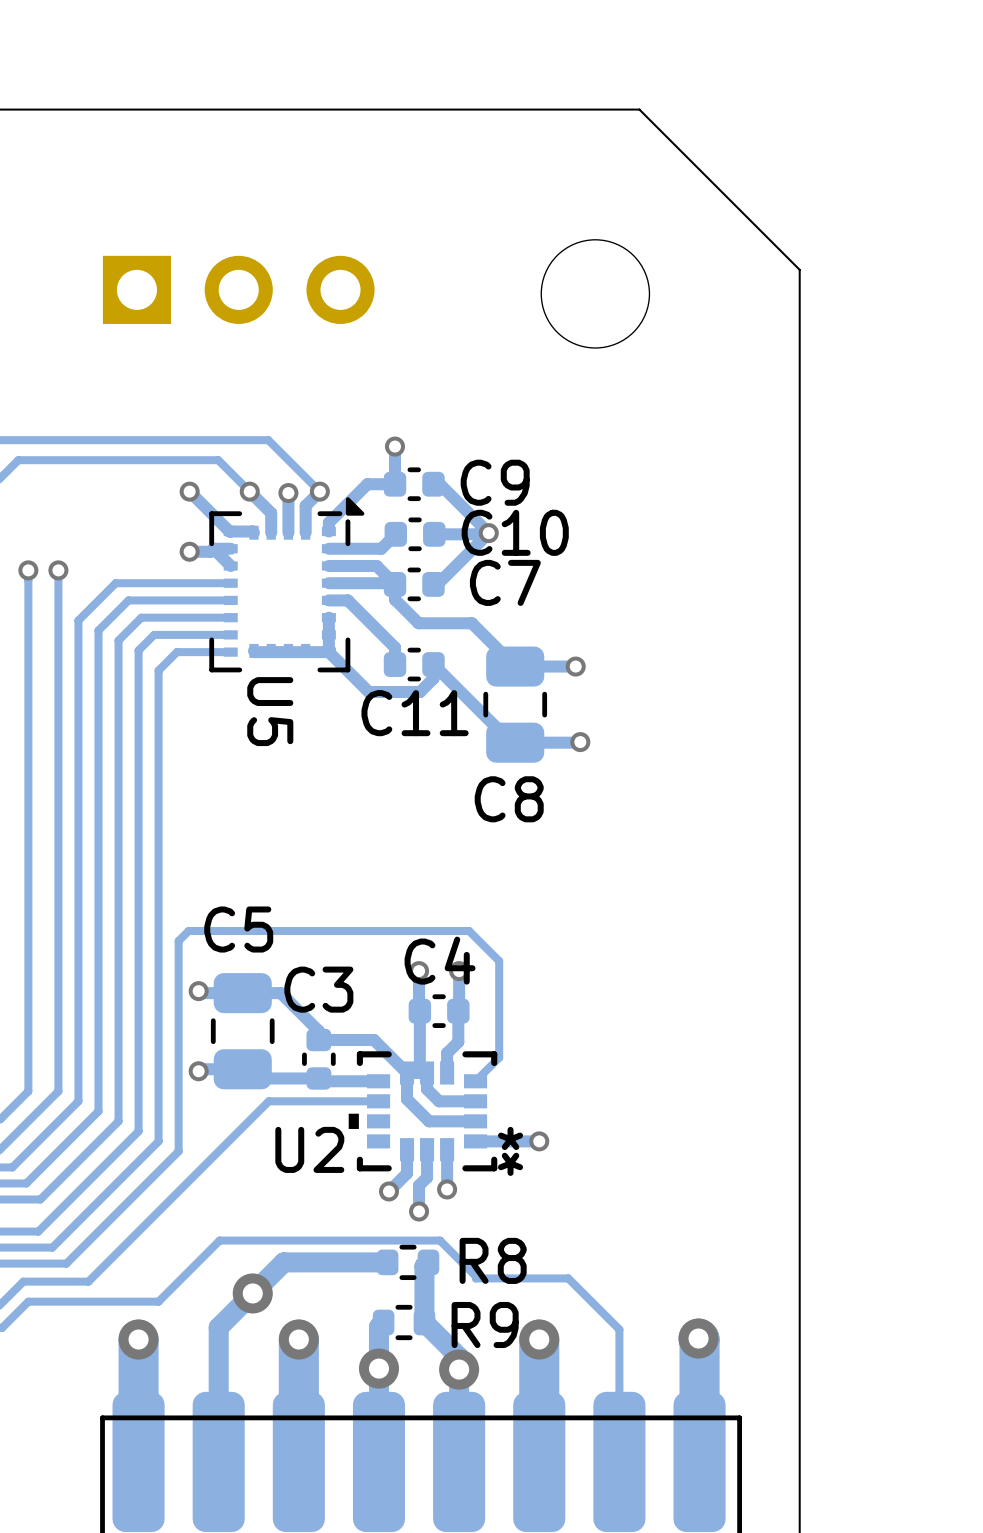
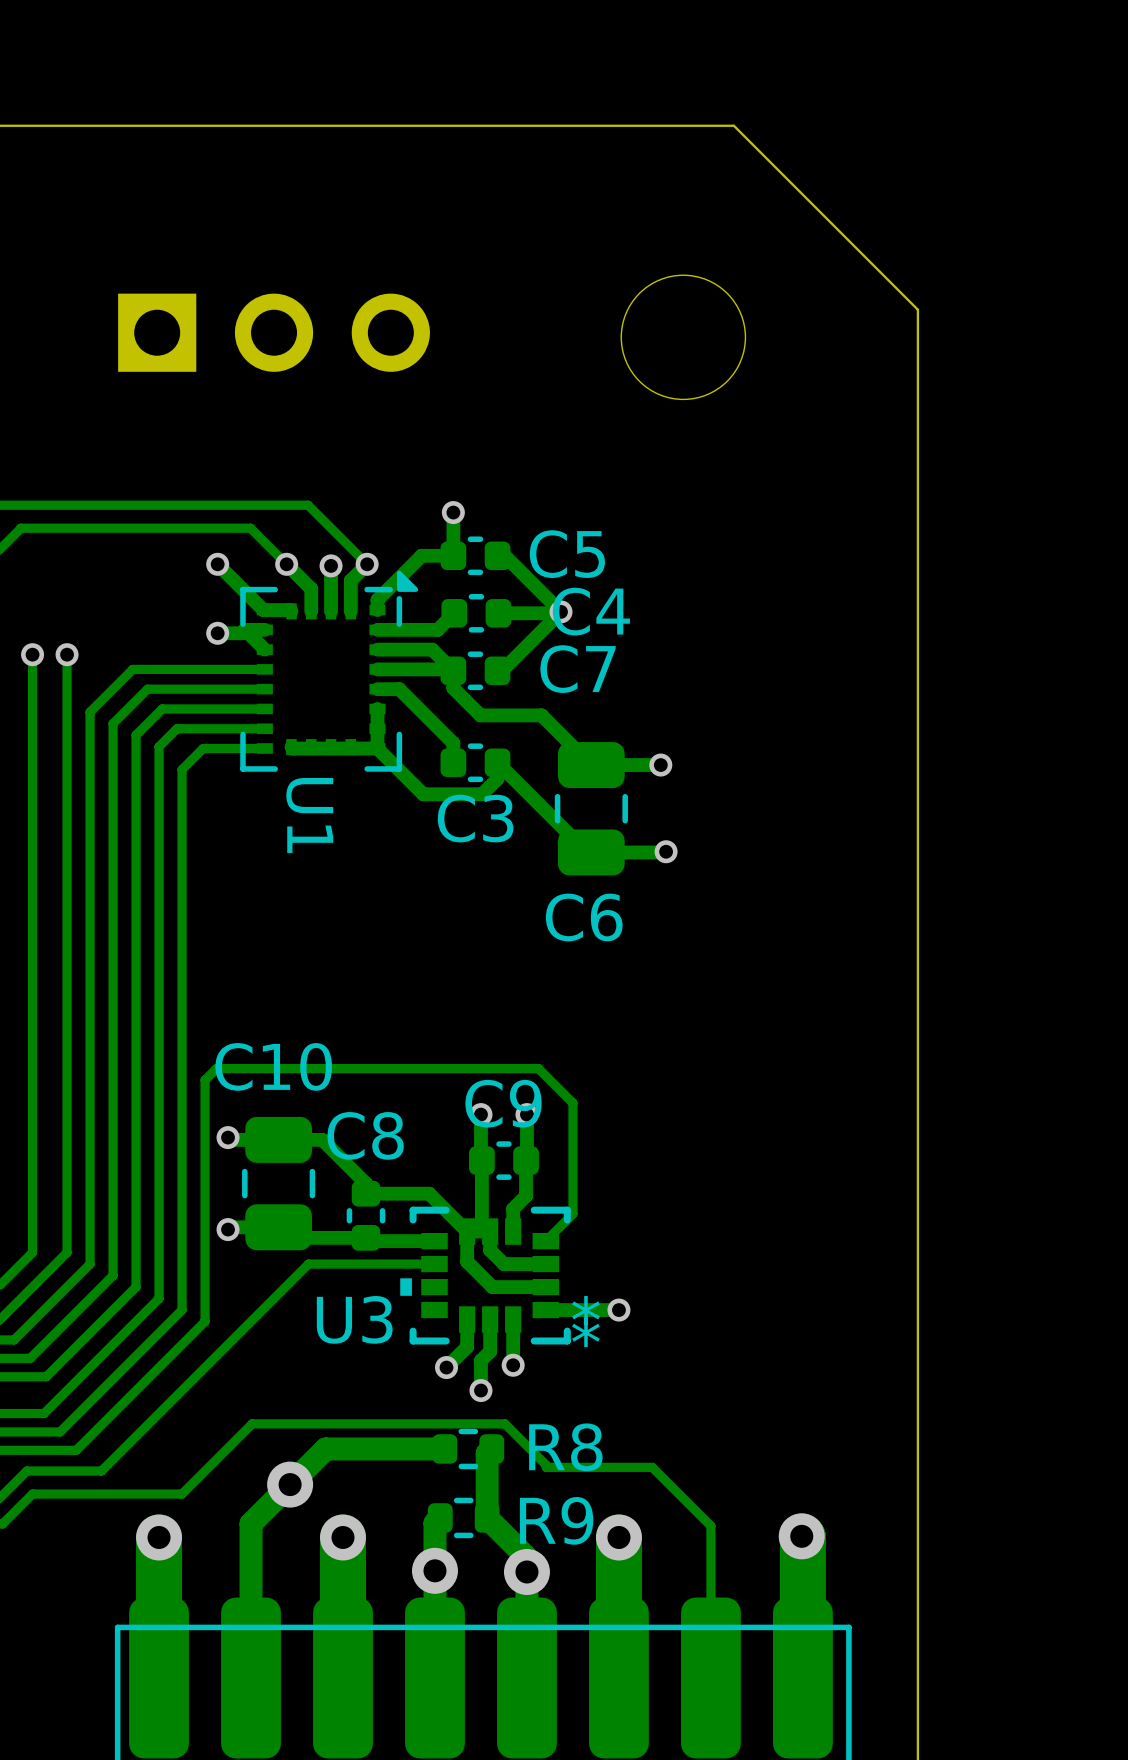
C9 name: C9 (495, 482) -> C5 (567, 554)
C10 name: C10 (515, 532) -> C4 (591, 611)
U5 name: U5 (270, 711) -> U1 (309, 815)
C11 name: C11 (415, 713) -> C3 (475, 818)
C8 name: C8 (509, 799) -> C6 (584, 917)
C5 name: C5 (238, 929) -> C10 (273, 1066)
C4 name: C4 (440, 960) -> C9 (503, 1103)
C3 name: C3 (318, 989) -> C8 (365, 1135)
U2 name: U2 (309, 1149) -> U3 (354, 1319)

